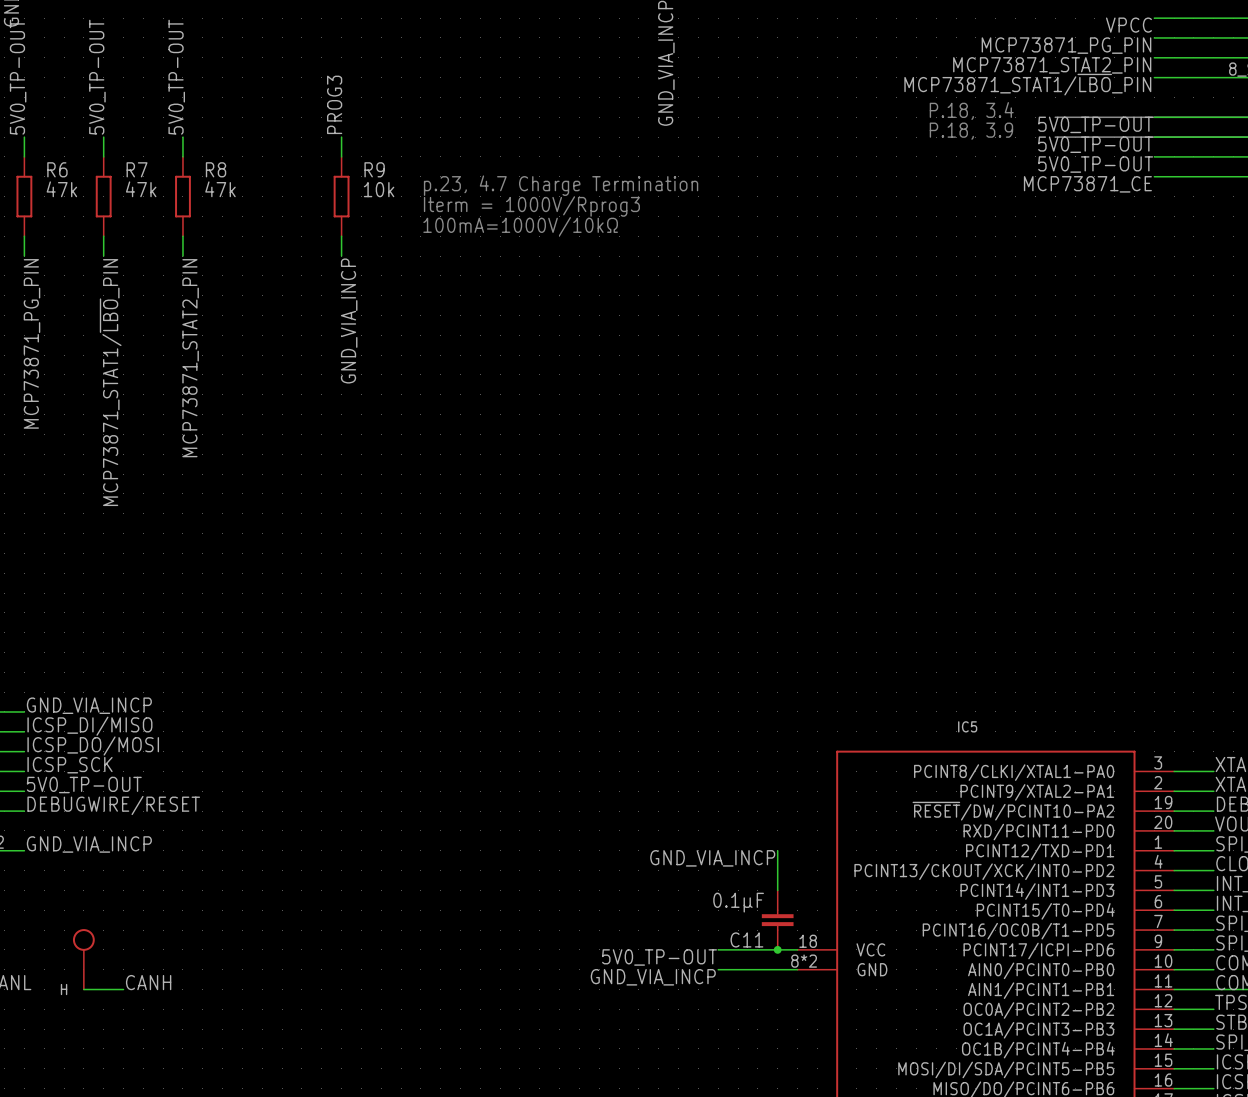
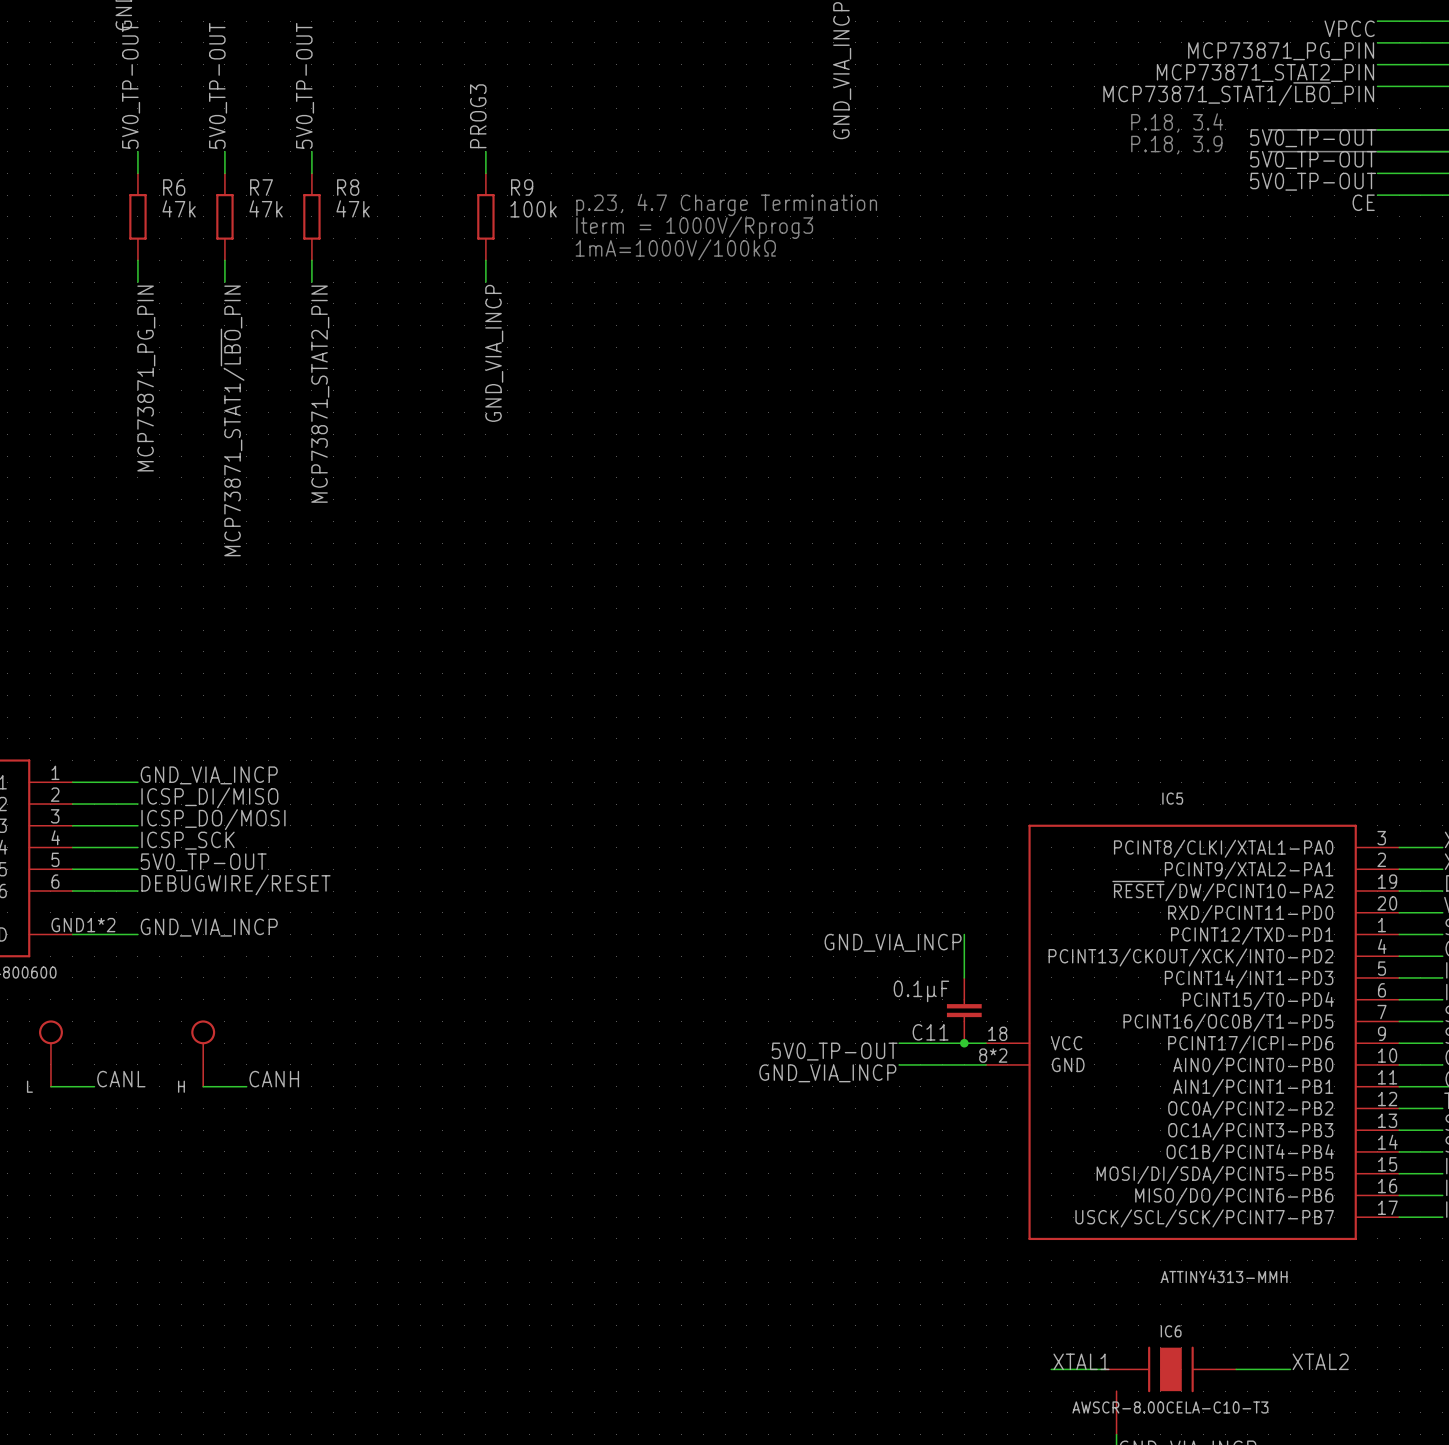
label: MCP73871_CE (1087, 184) -> CE (1363, 202)
R9 value: 10k (379, 189) -> 100k (533, 209)
text: 100mA=1000V/10kΩ (520, 226) -> 1mA=1000V/100kΩ (675, 249)

